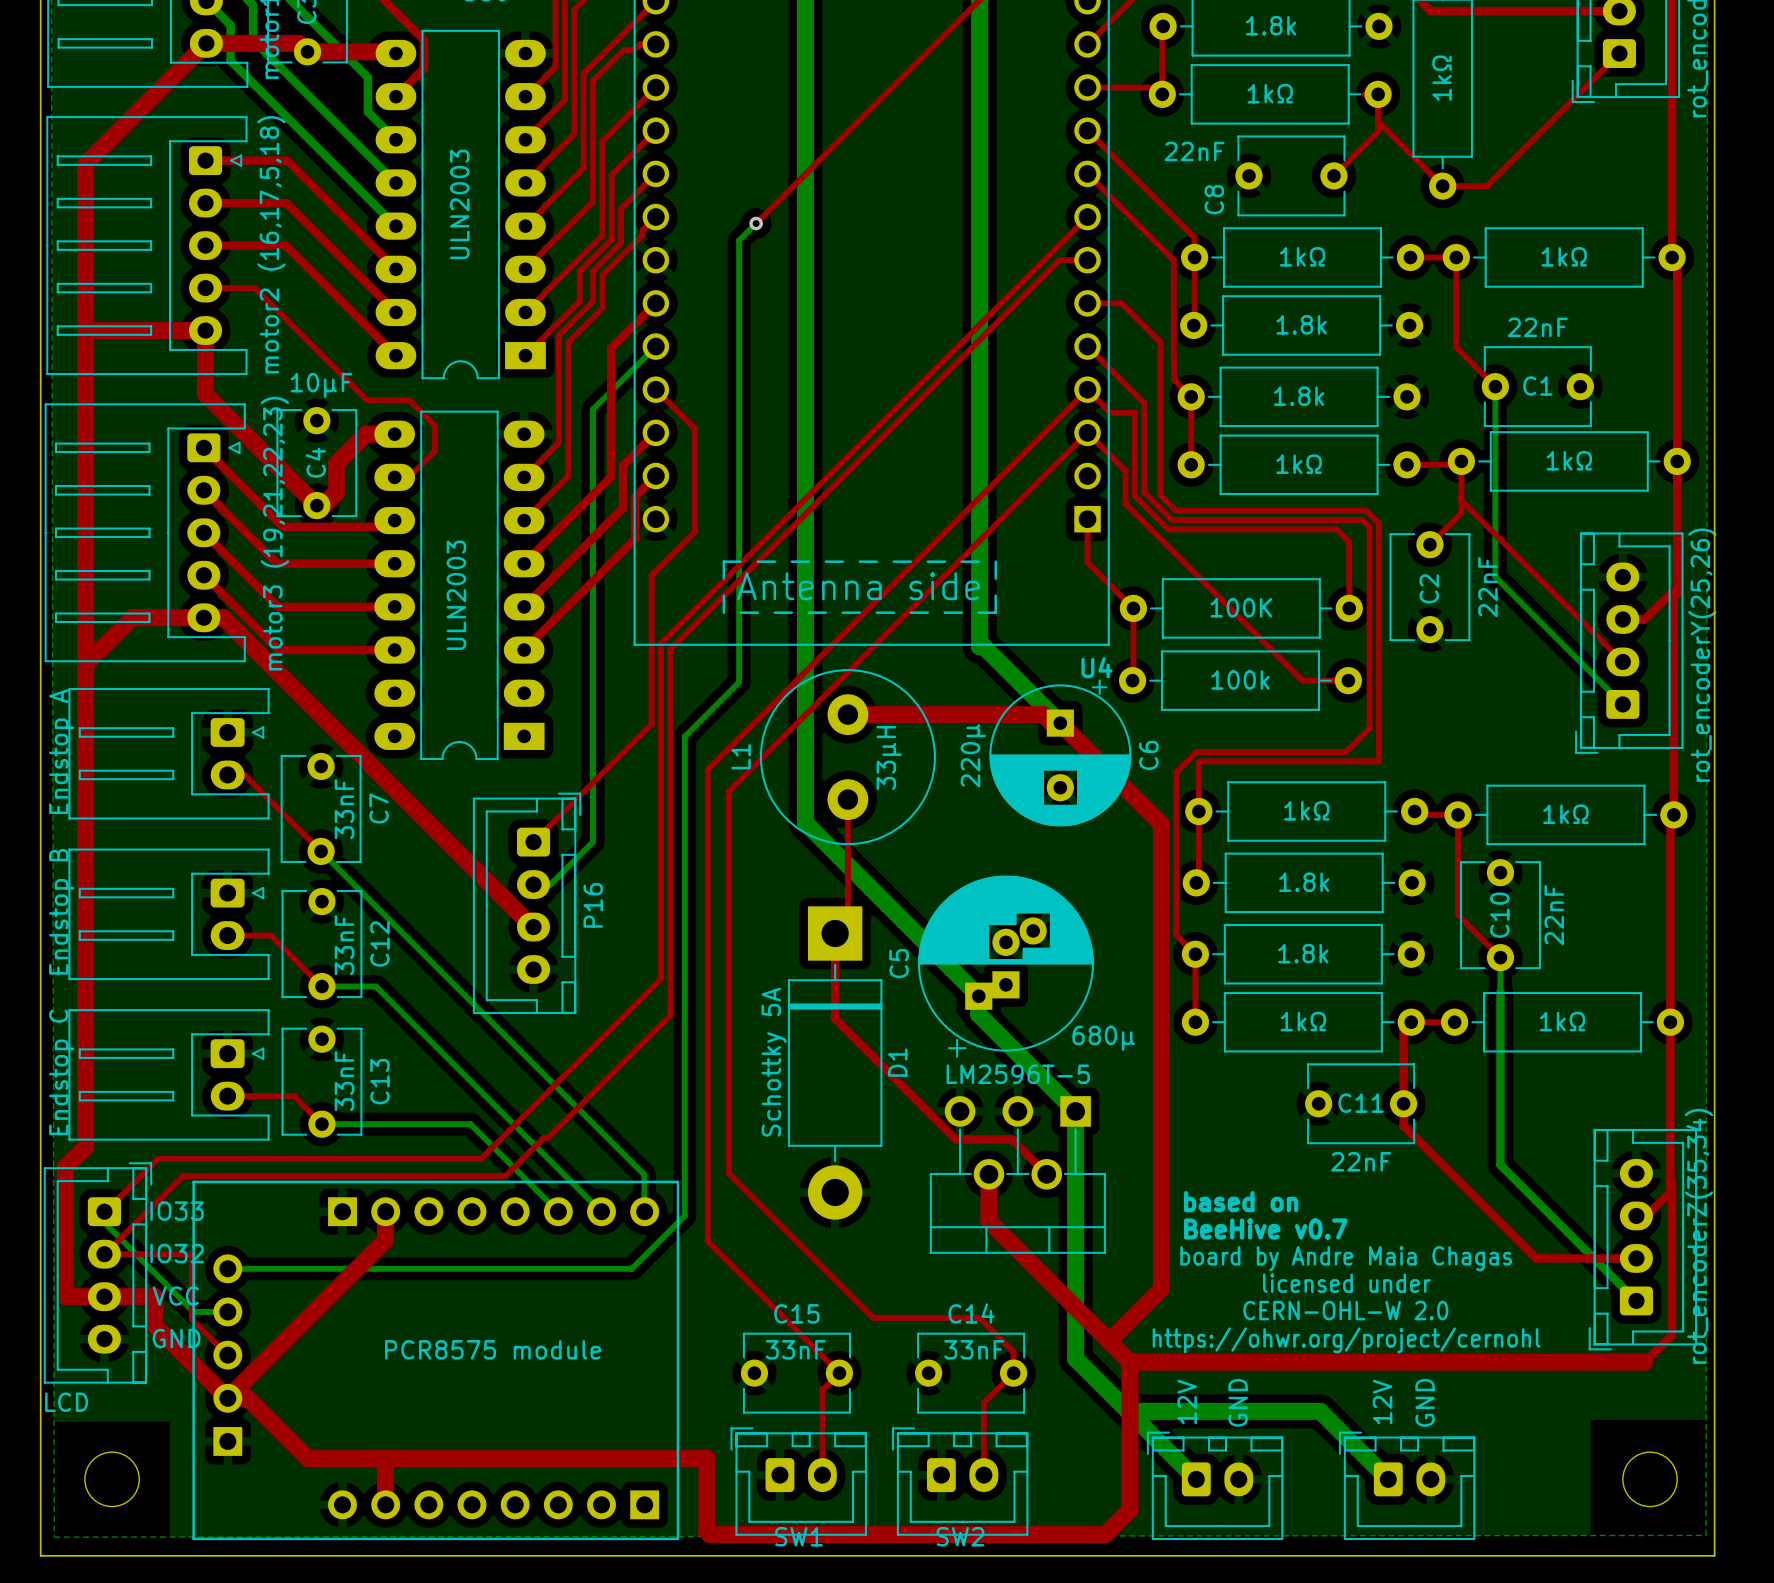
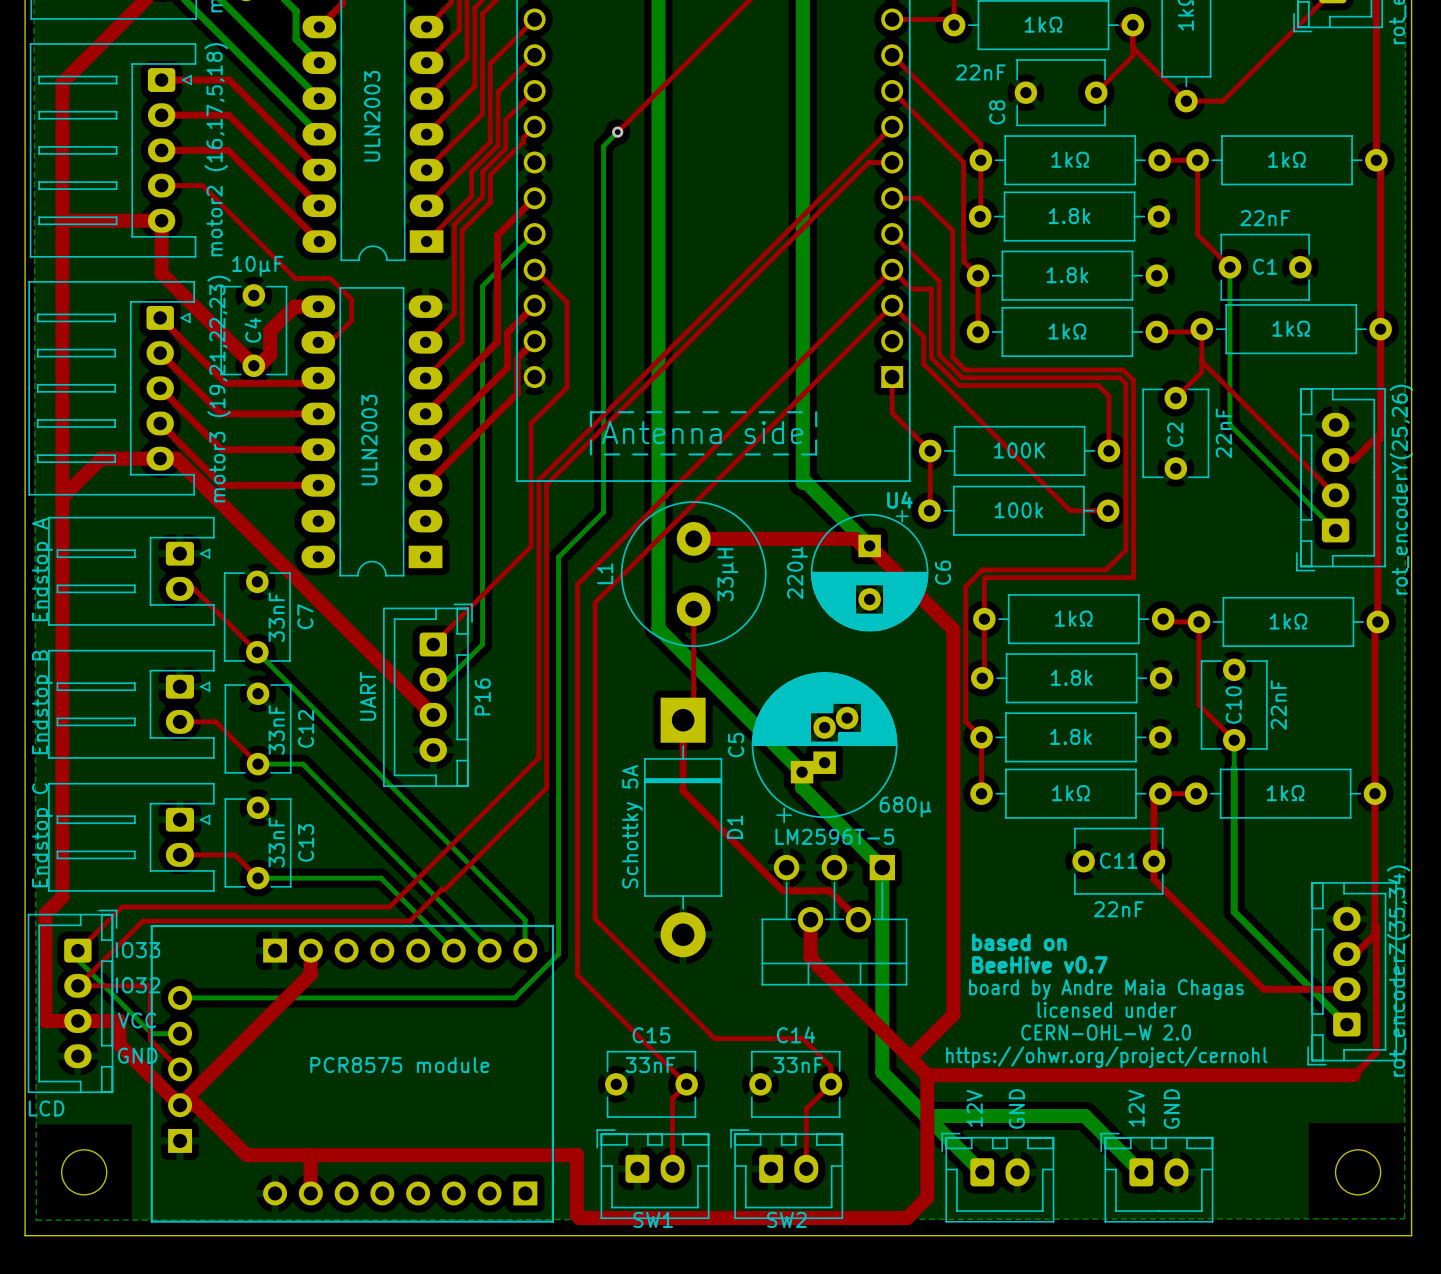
P16 value: none -> UART (368, 696)

